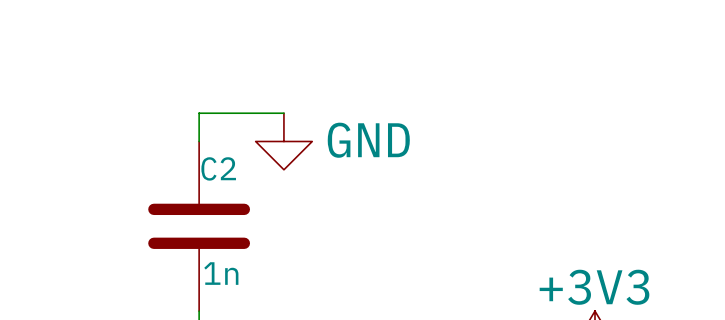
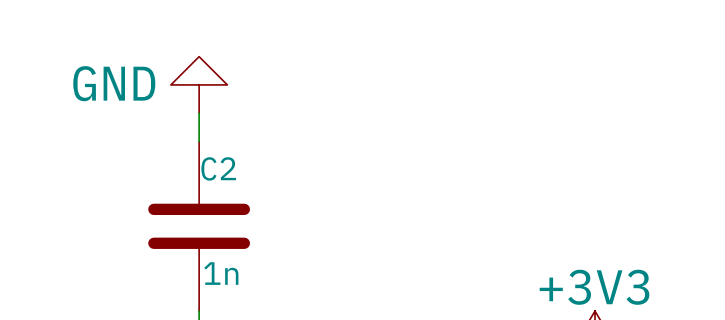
wire: (199, 113) (283, 113) -> none
power symbol rotation: 0° (283, 141) -> 180° (199, 84)
power symbol position: GND (283, 141) -> GND (199, 84)

